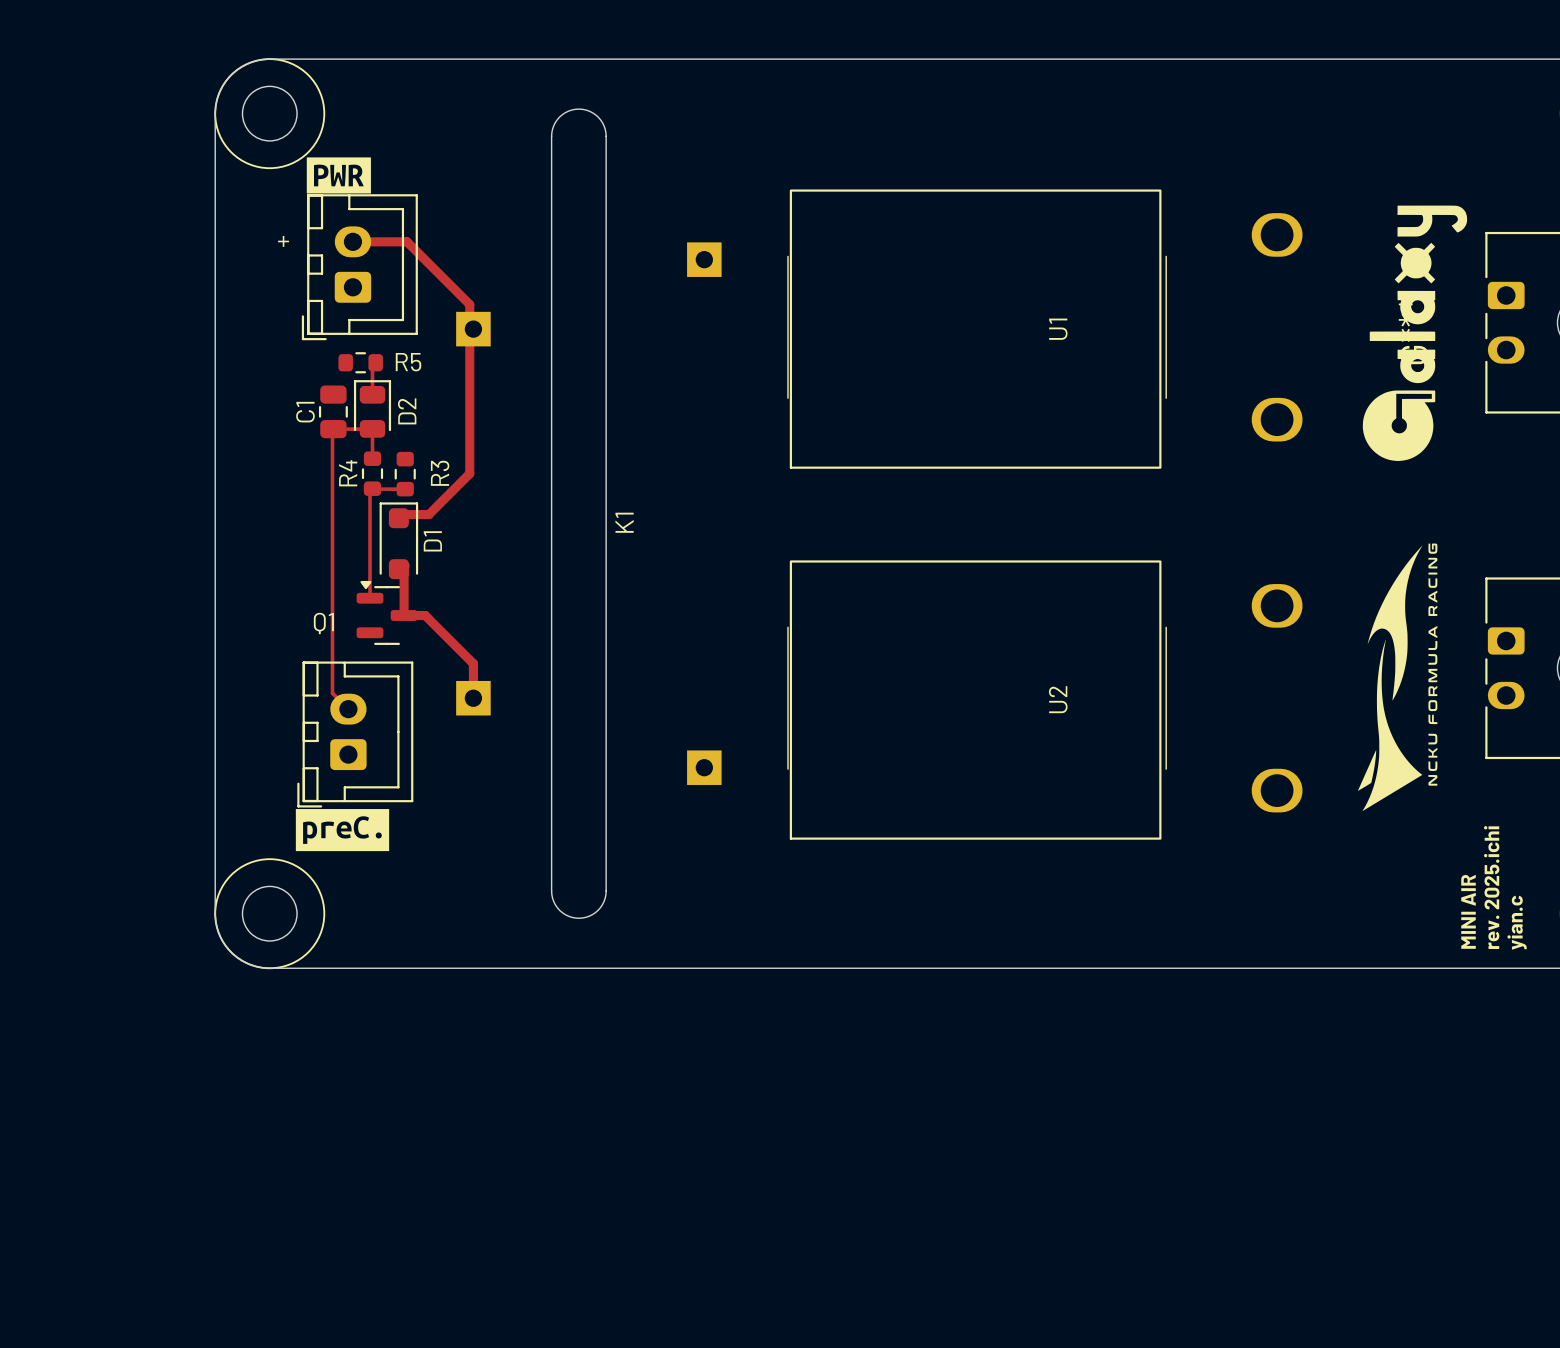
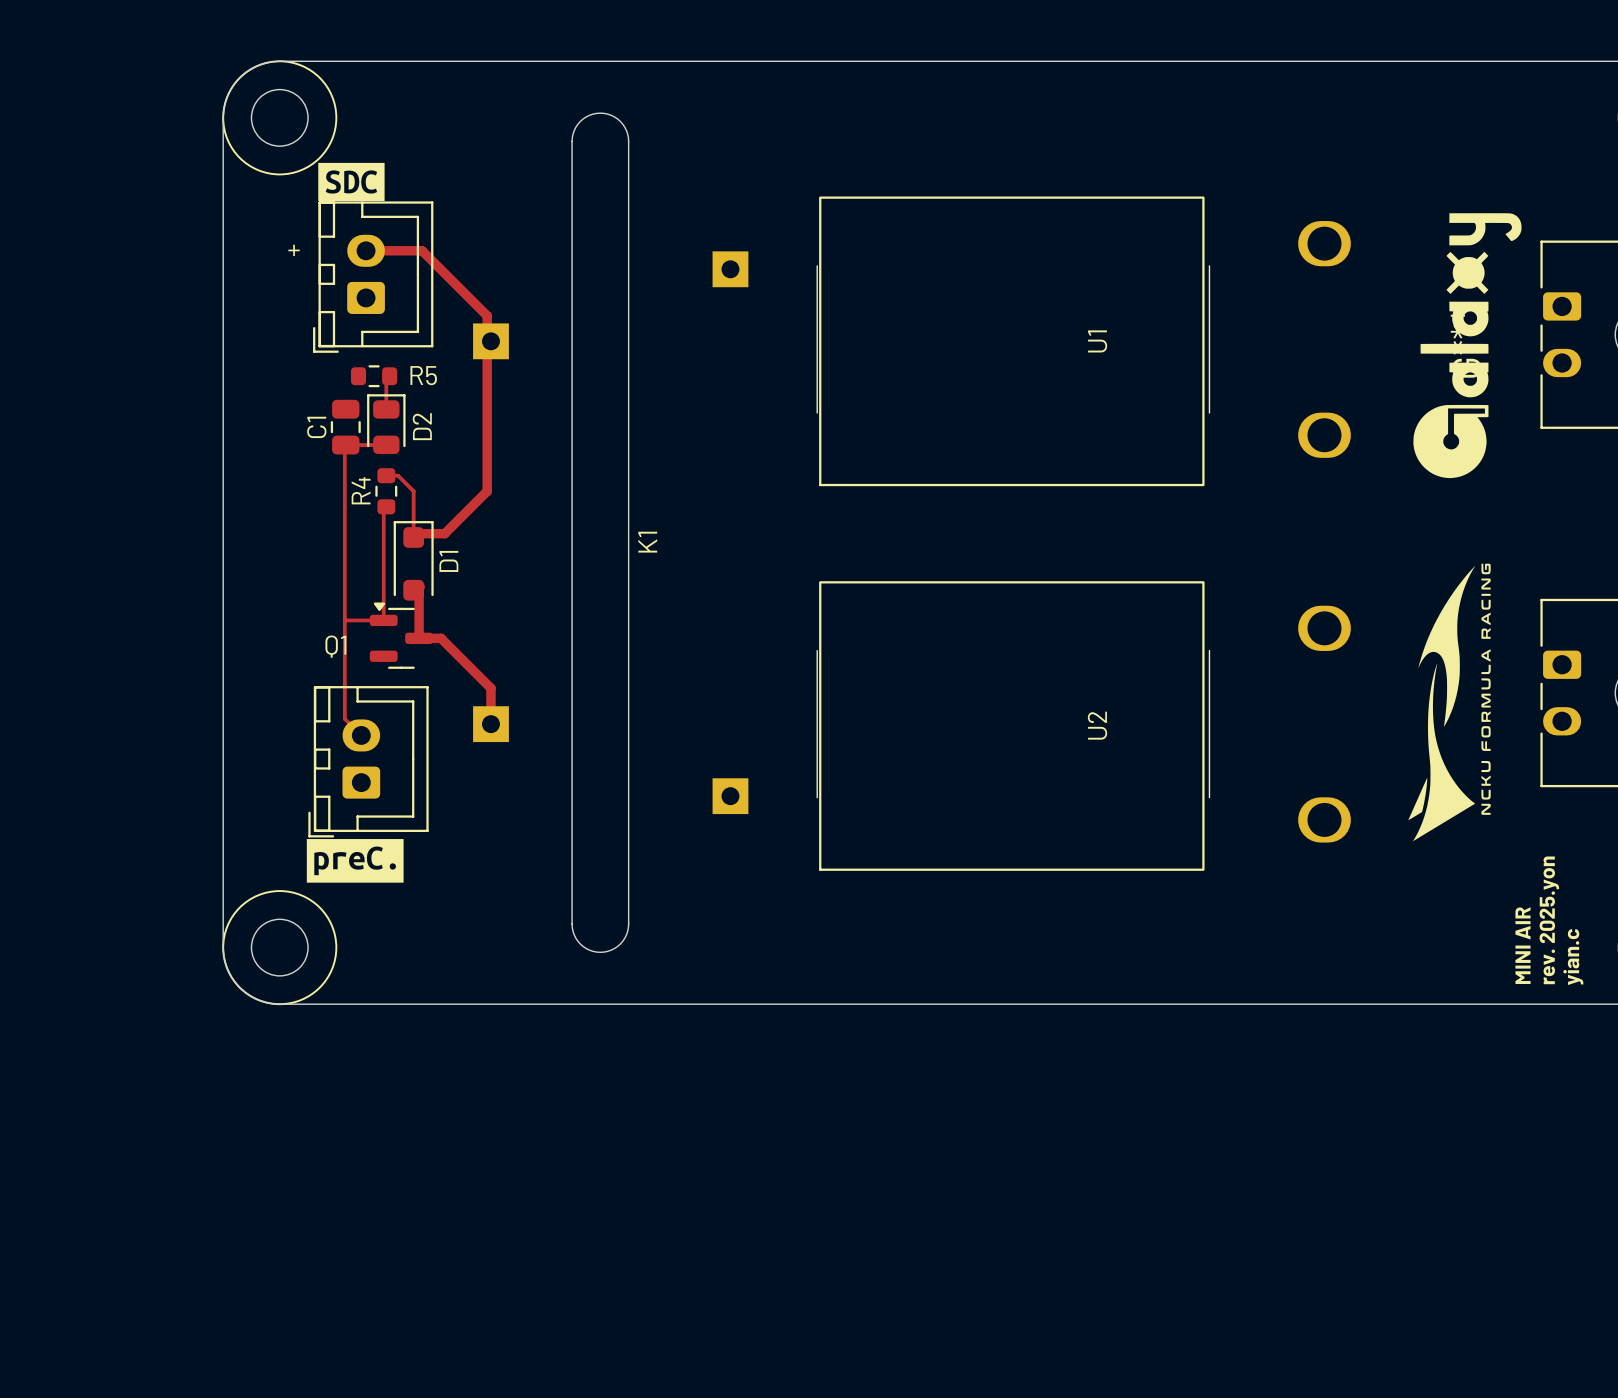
drawing shape: [306, 157, 371, 194] -> [318, 162, 385, 202]
track: (372, 428) (372, 458) -> (413, 537) (413, 491) (398, 475) (386, 475)
R3: (405, 474) -> none
track: (372, 489) (405, 489) -> none
track: none -> (344, 619) (383, 620)
text: rev. 2025.ichi (1491, 887) -> rev. 2025.yon (1549, 920)

